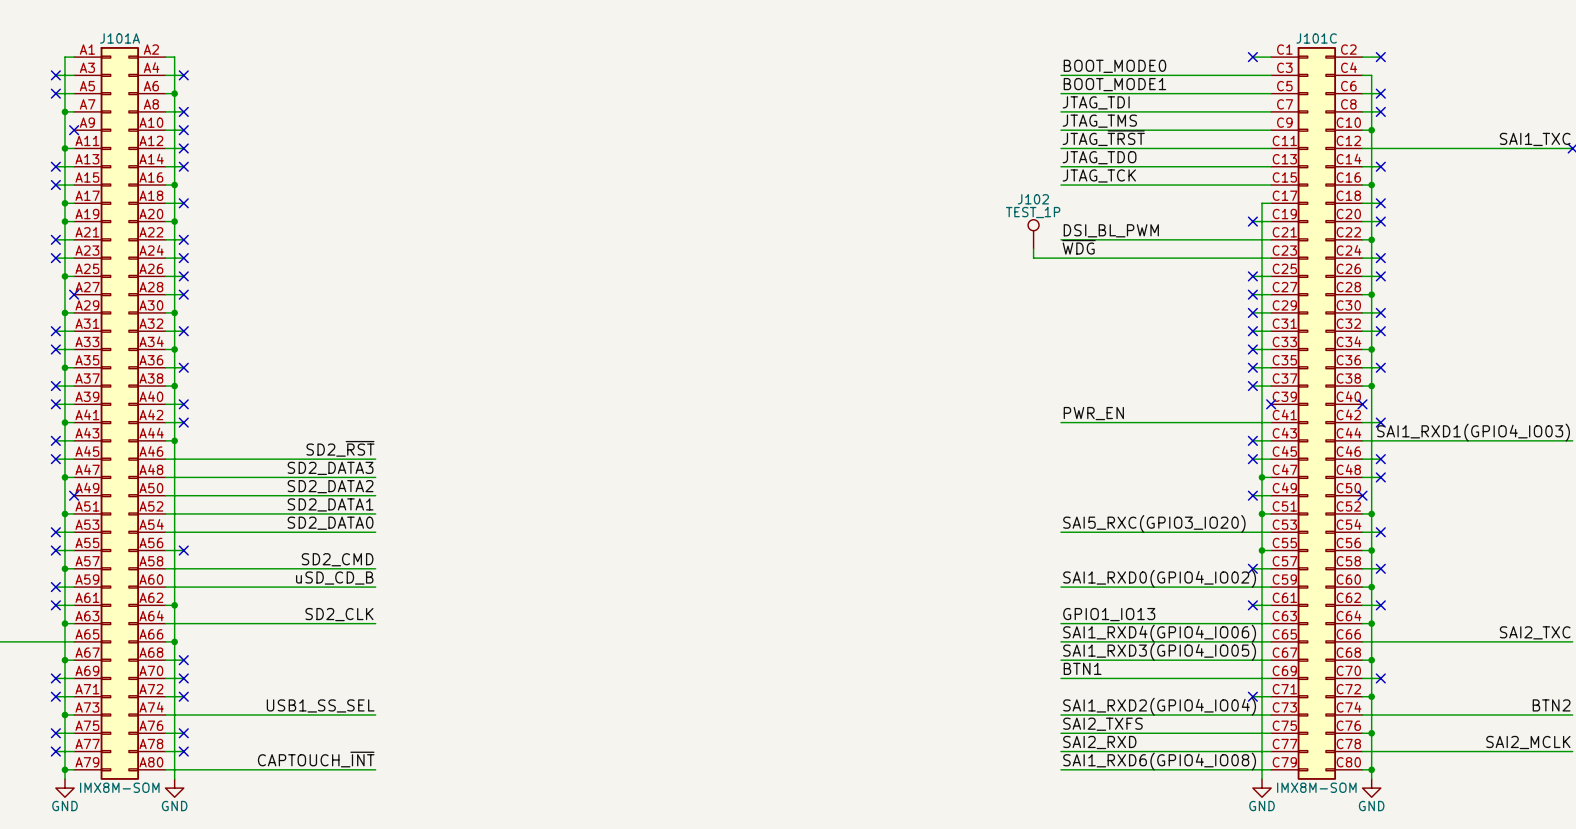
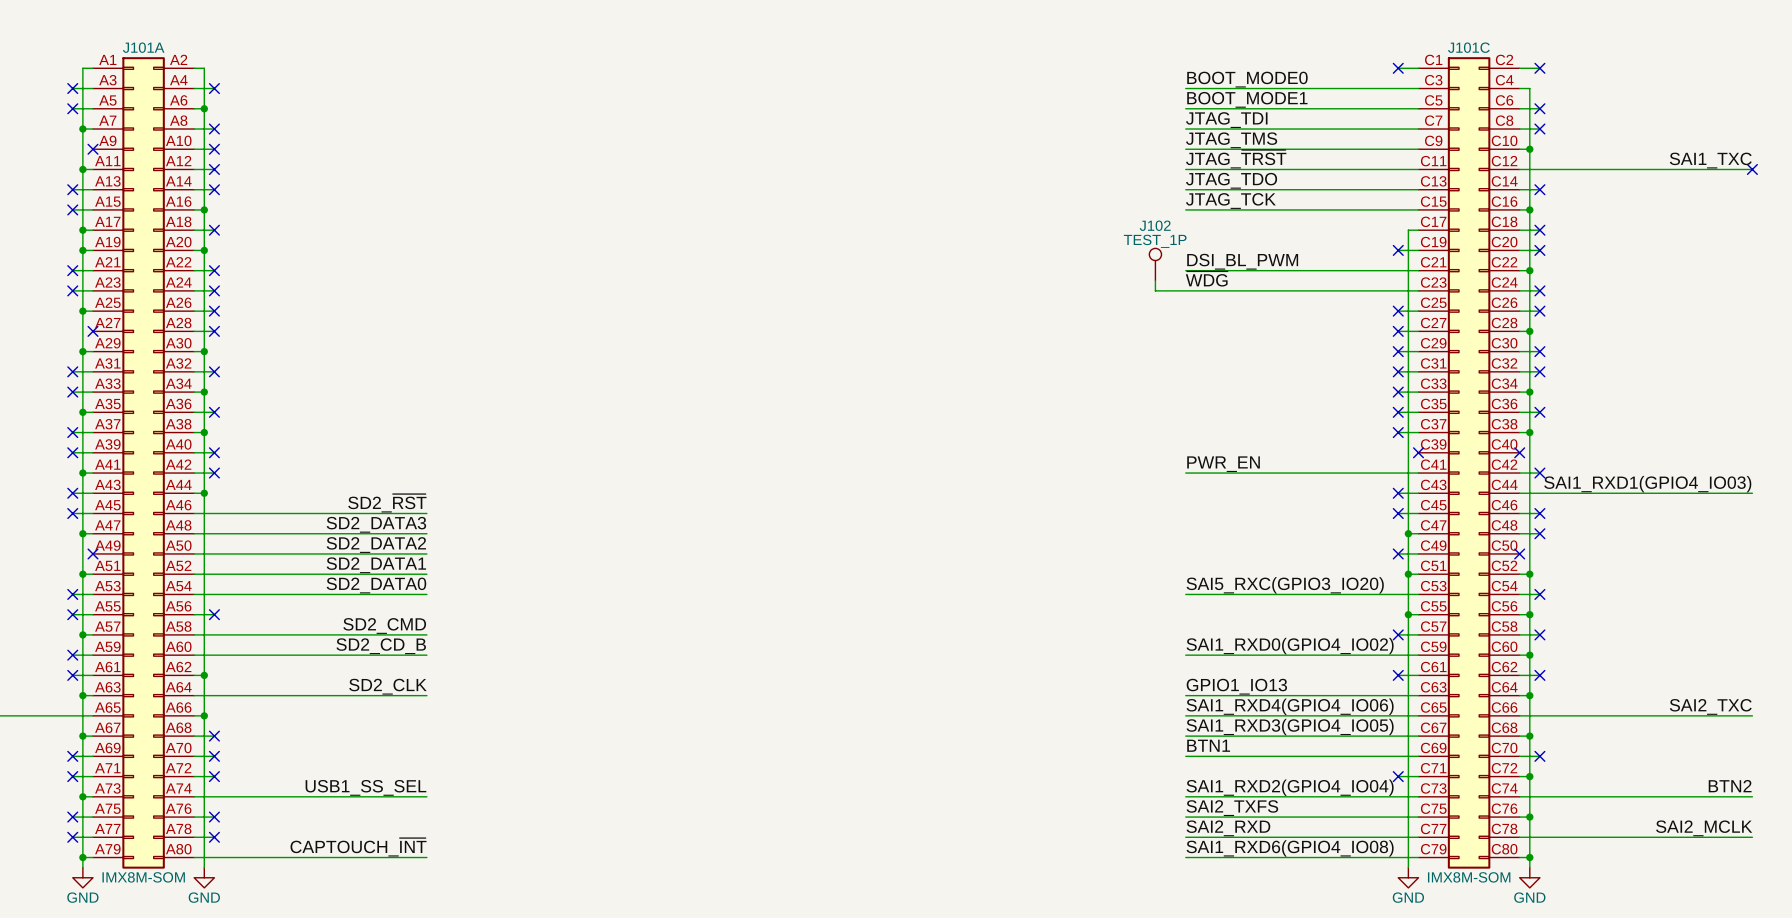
label: uSD_CD_B (334, 578) -> SD2_CD_B (381, 646)

